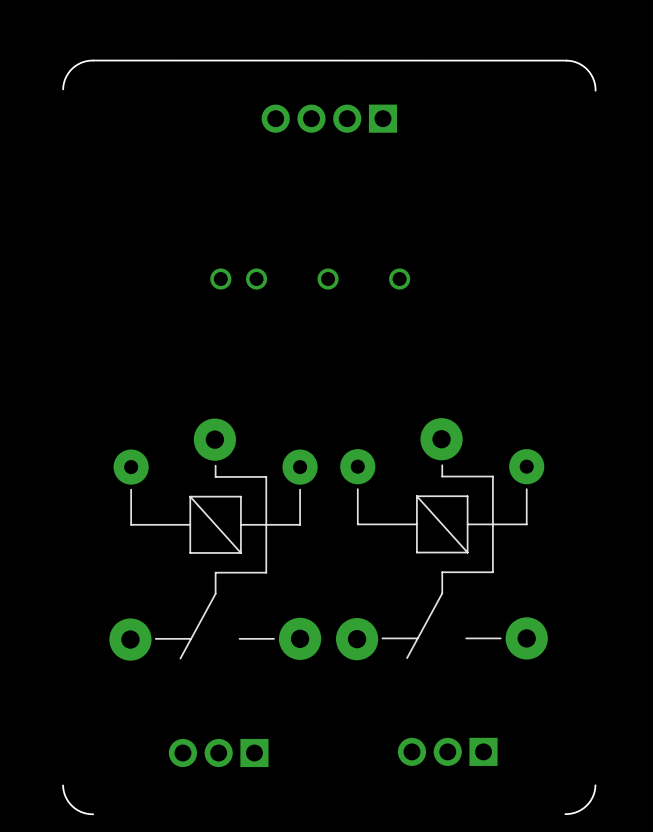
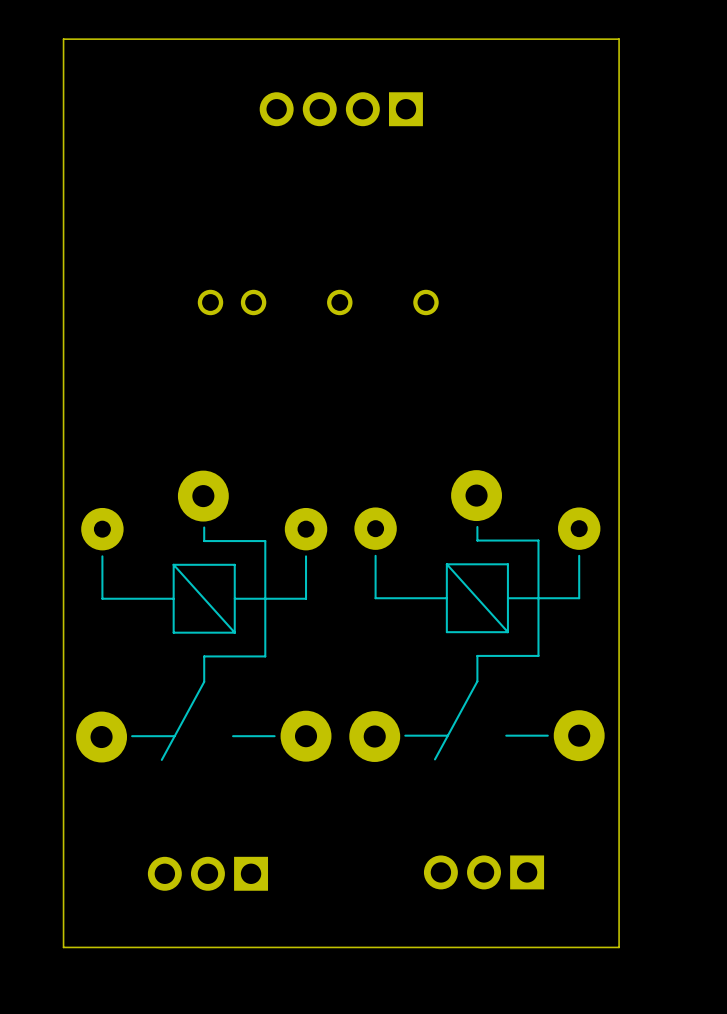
board edge: none -> (619, 39) (63, 39) (63, 947) (619, 947) (619, 39)
board edge: (63, 89) (65, 79) (69, 71) (77, 64) (89, 60) (566, 60) (579, 63) (587, 69) (592, 77) (595, 90) -> none
board edge: (63, 785) (66, 798) (72, 806) (80, 811) (93, 814) -> none
board edge: (595, 785) (592, 798) (586, 805) (578, 811) (565, 814) -> none

